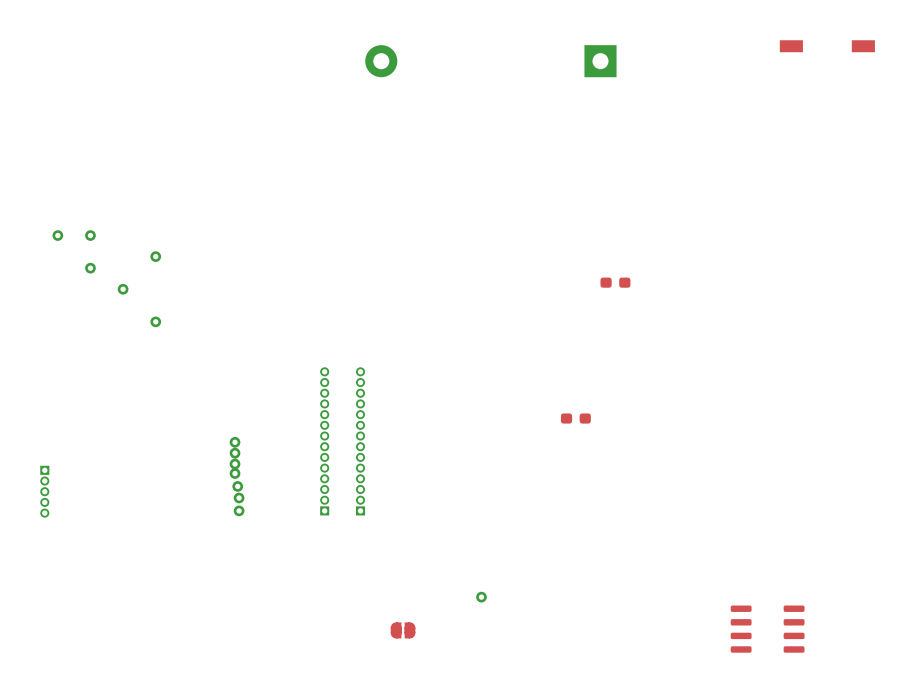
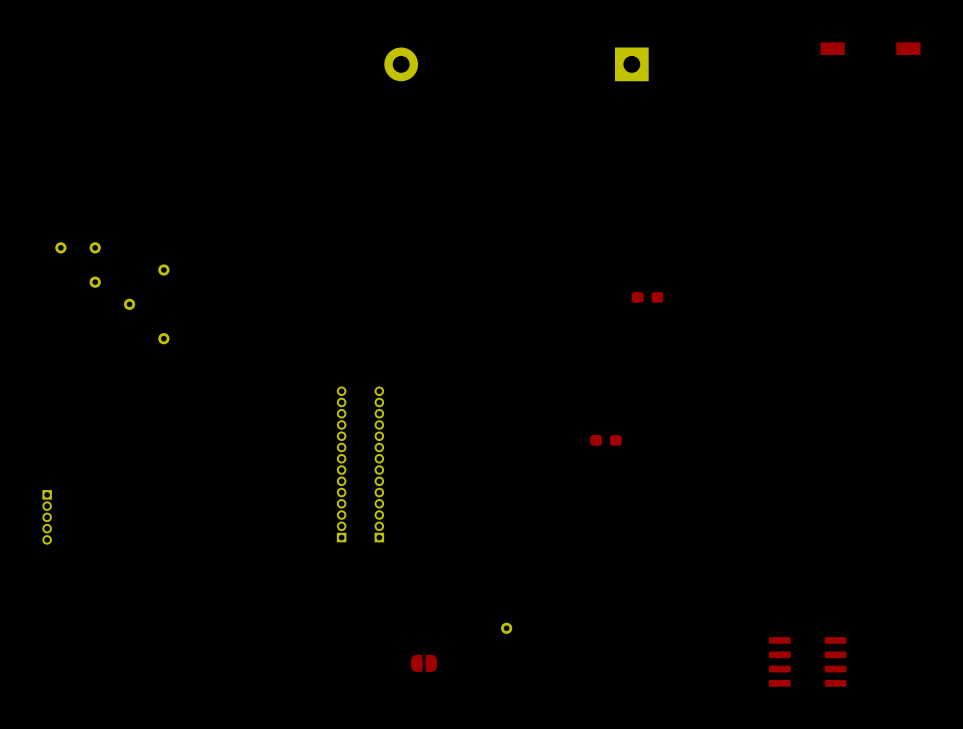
part: (235, 442) -> none
part: (235, 453) -> none
part: (235, 464) -> none
part: (235, 473) -> none
part: (237, 486) -> none
part: (239, 497) -> none
part: (239, 510) -> none

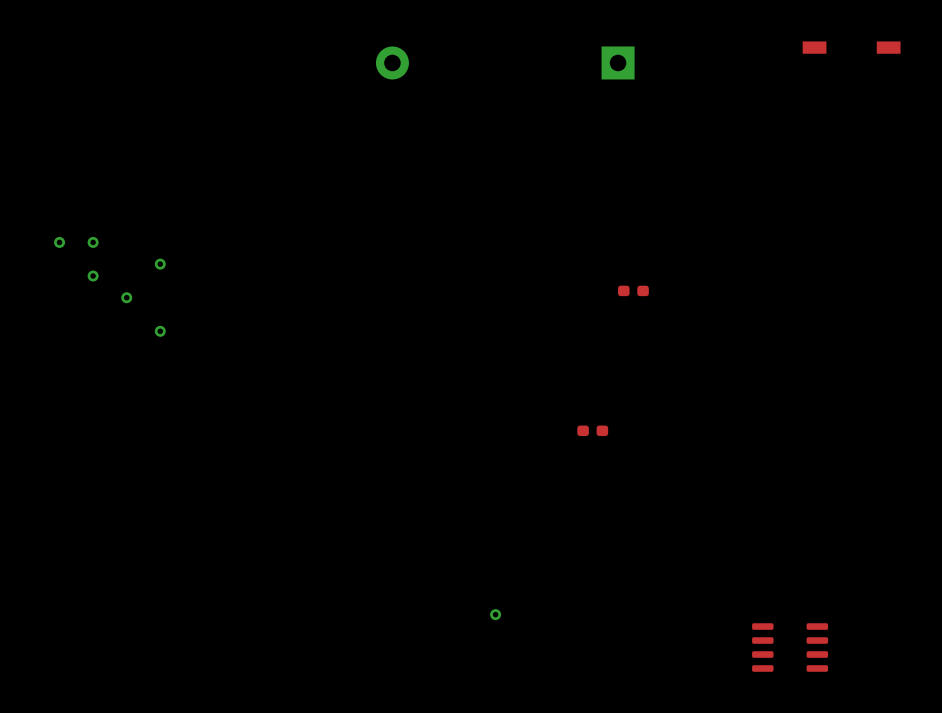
part: (341, 464) -> none
part: (379, 464) -> none
part: (47, 517) -> none
part: (424, 663) -> none

